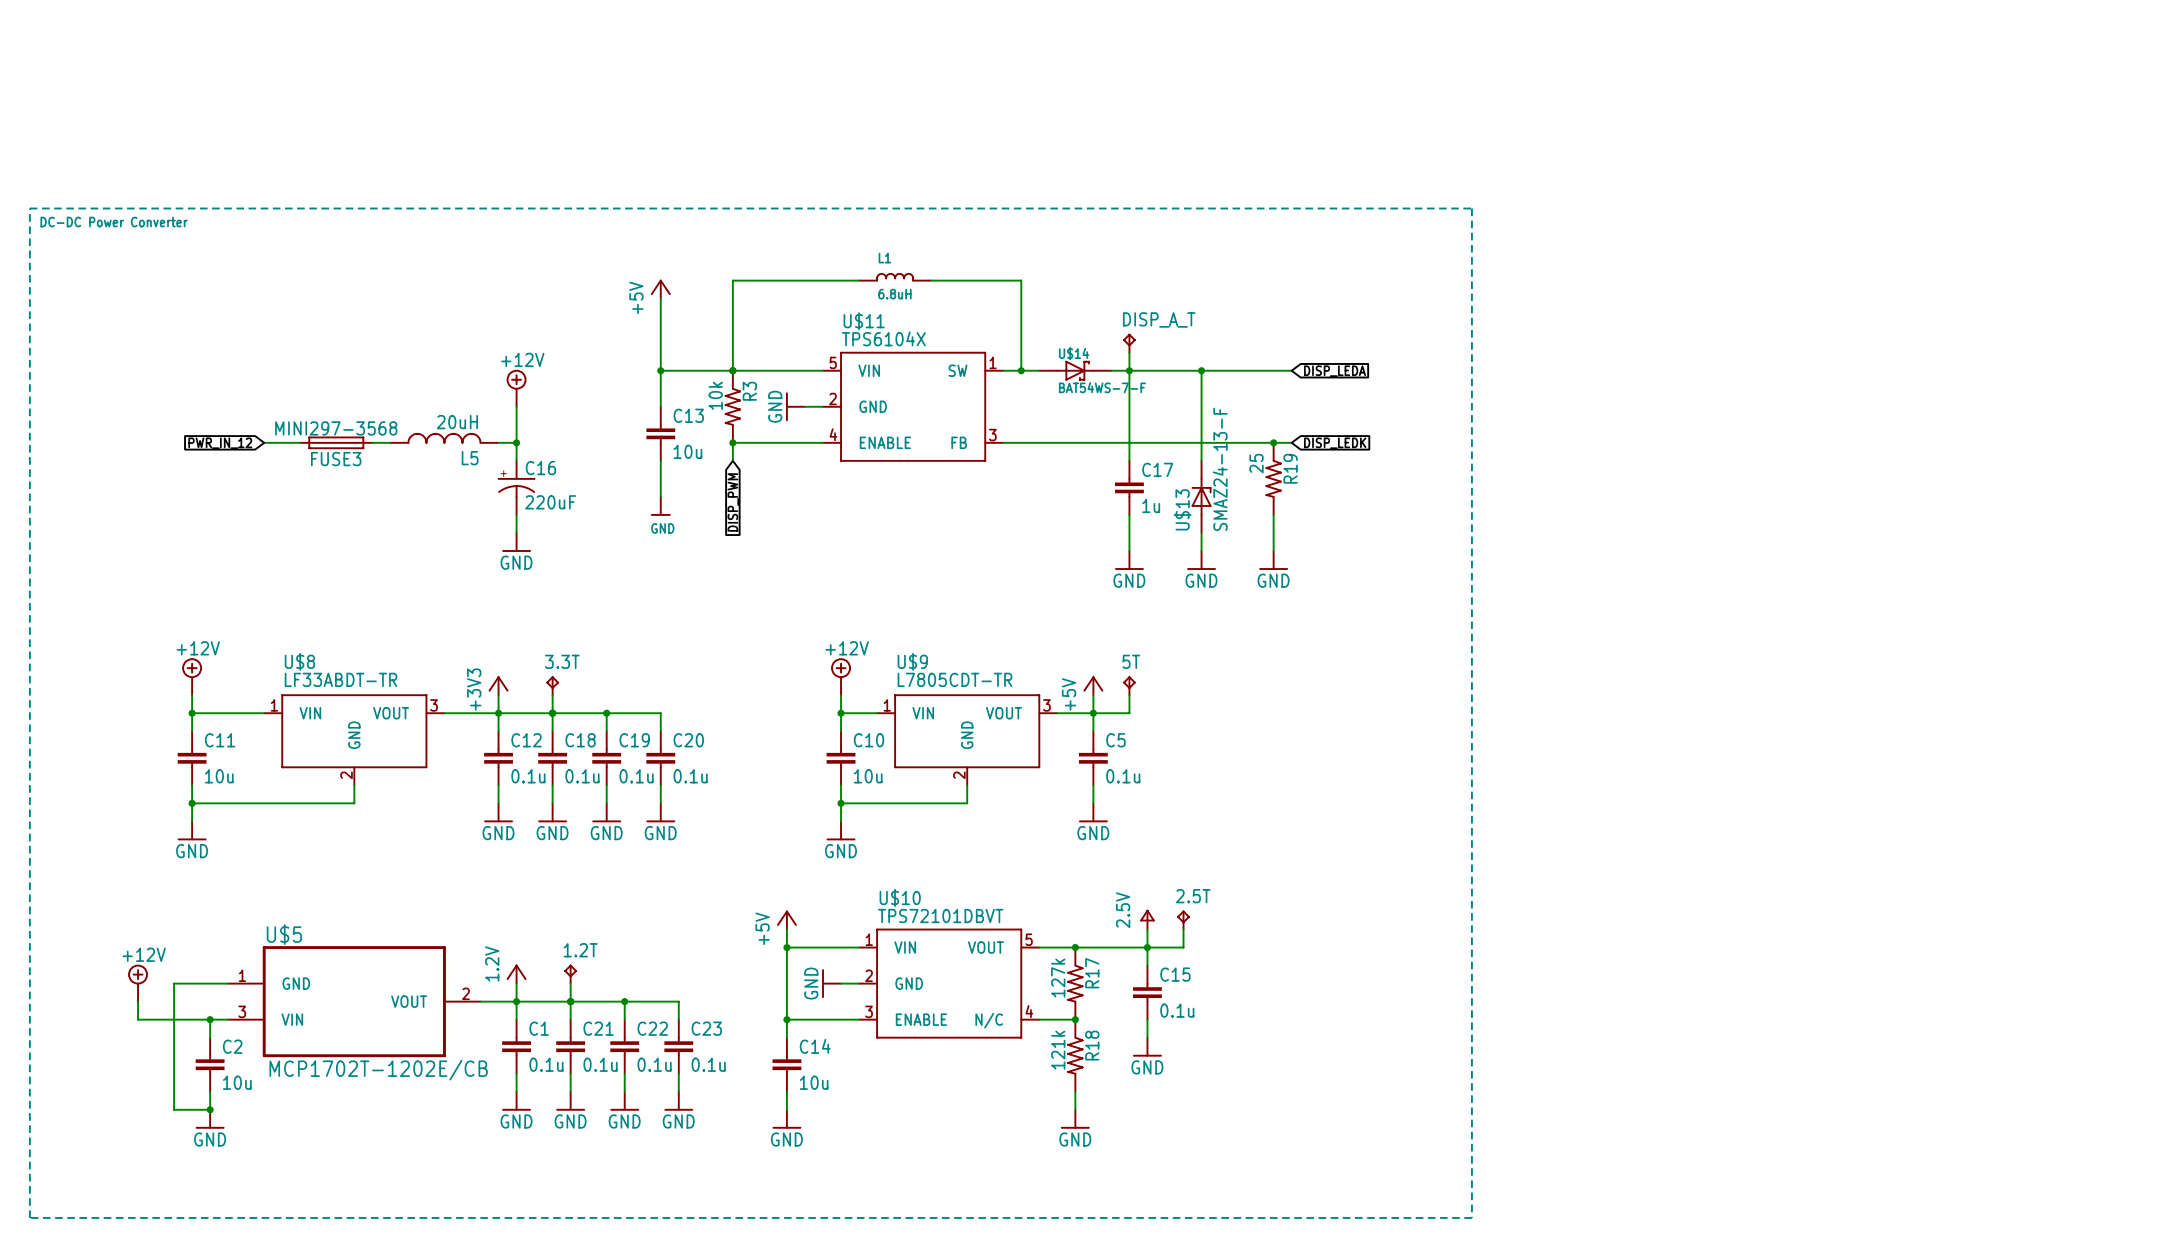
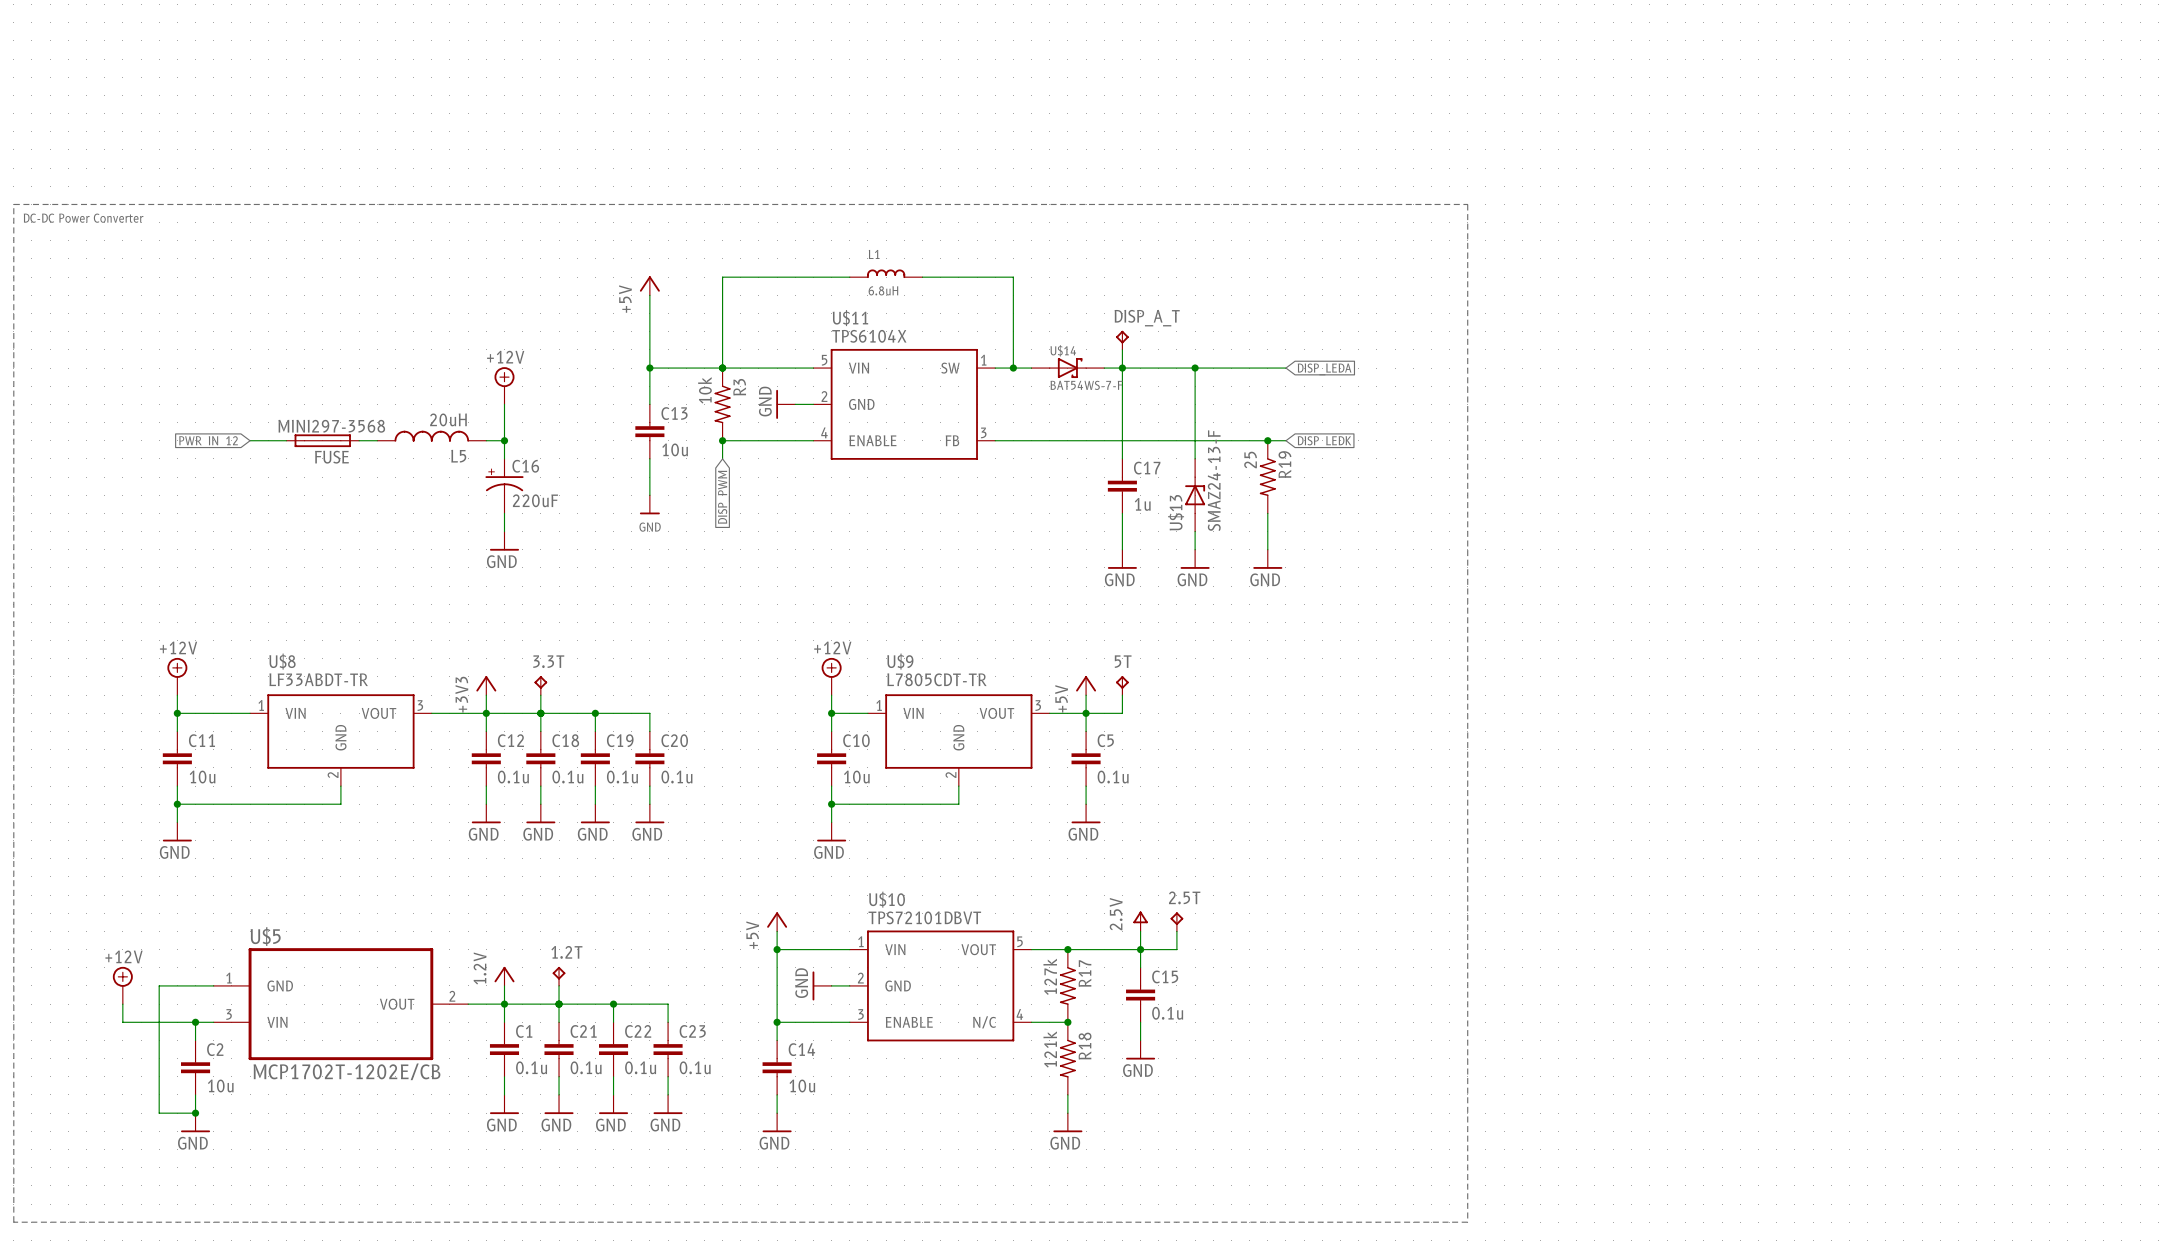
FUSE3 name: FUSE3 (336, 459) -> FUSE (331, 457)

